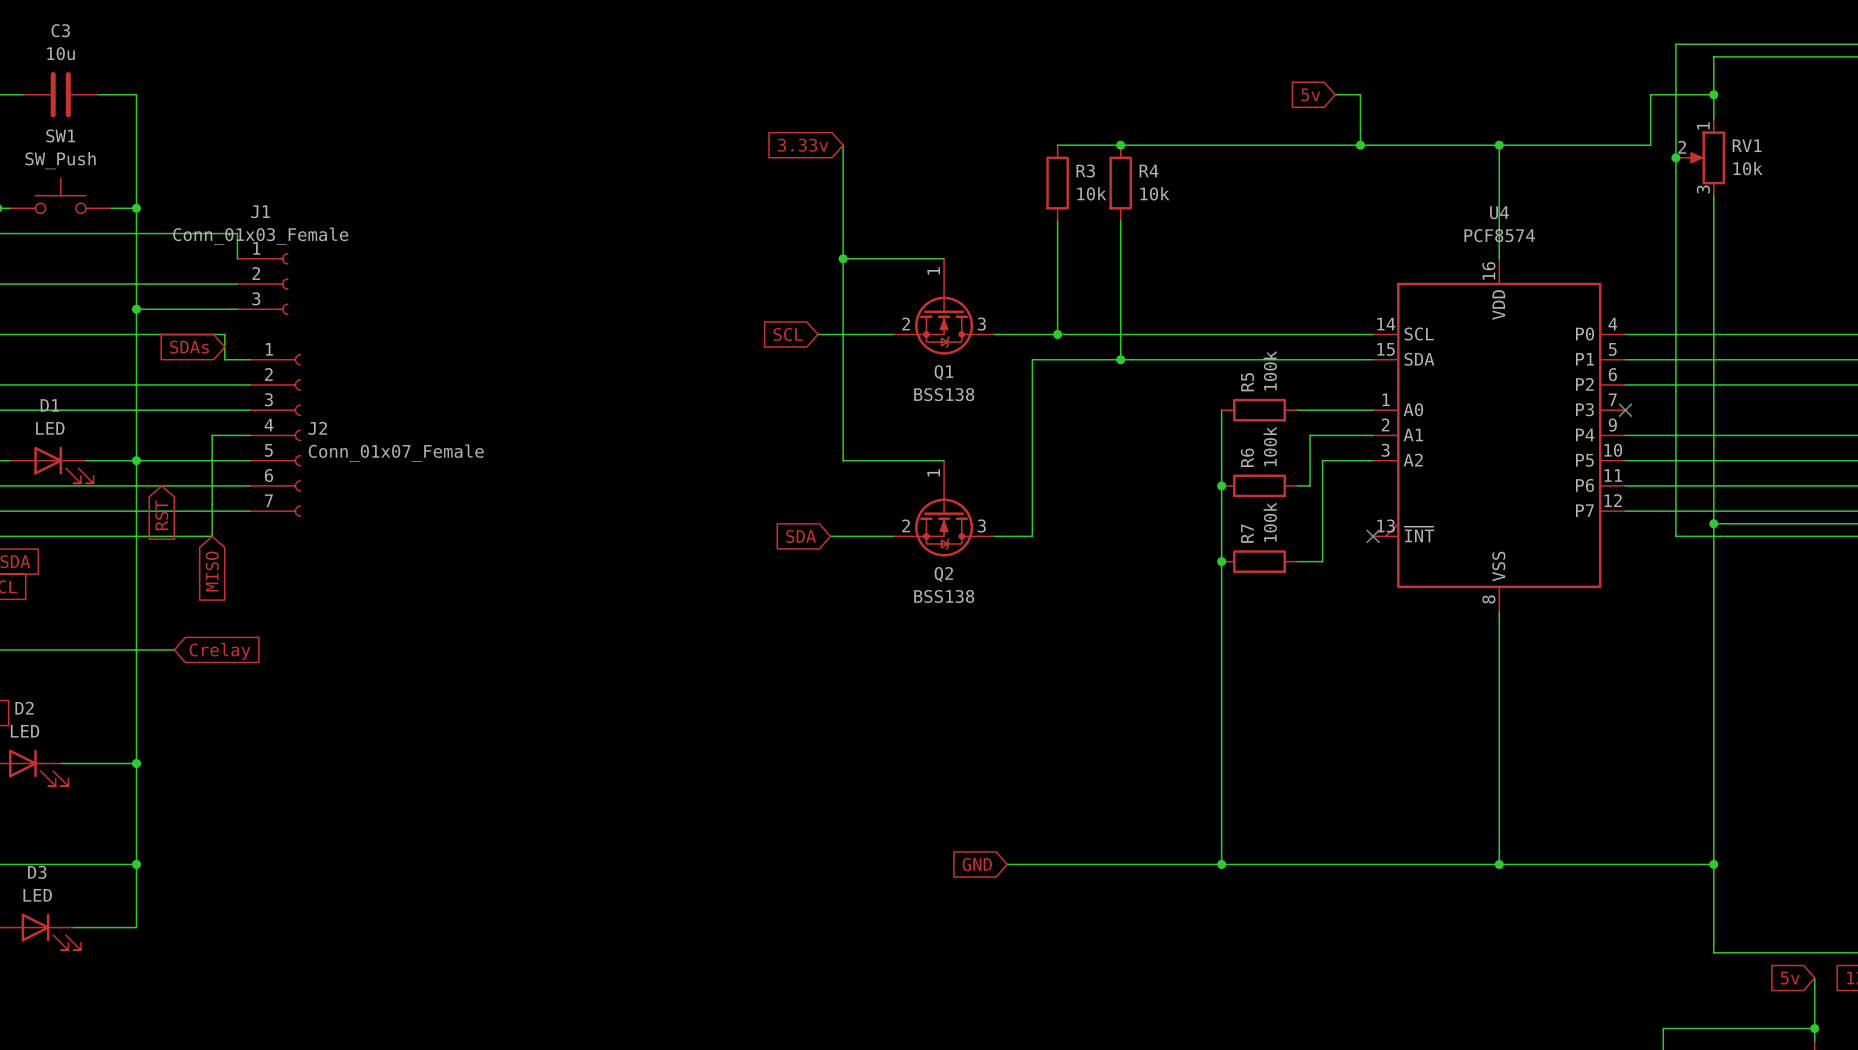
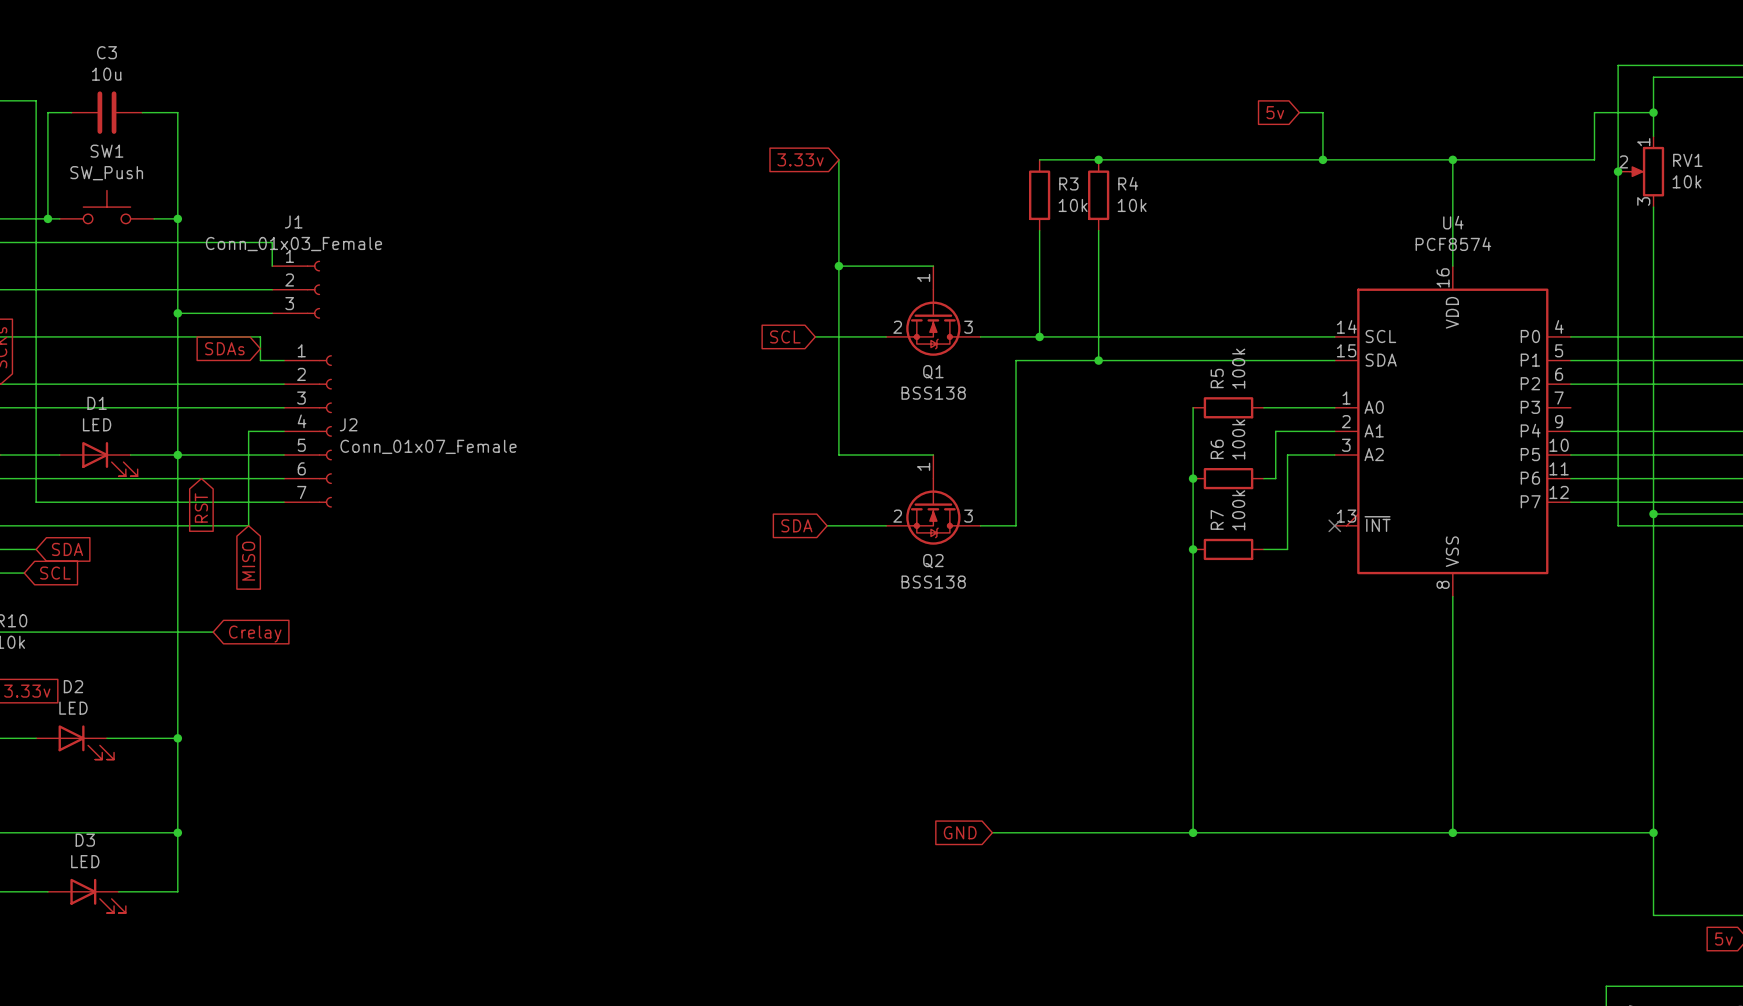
no-connect mark: (1625, 410) -> none

